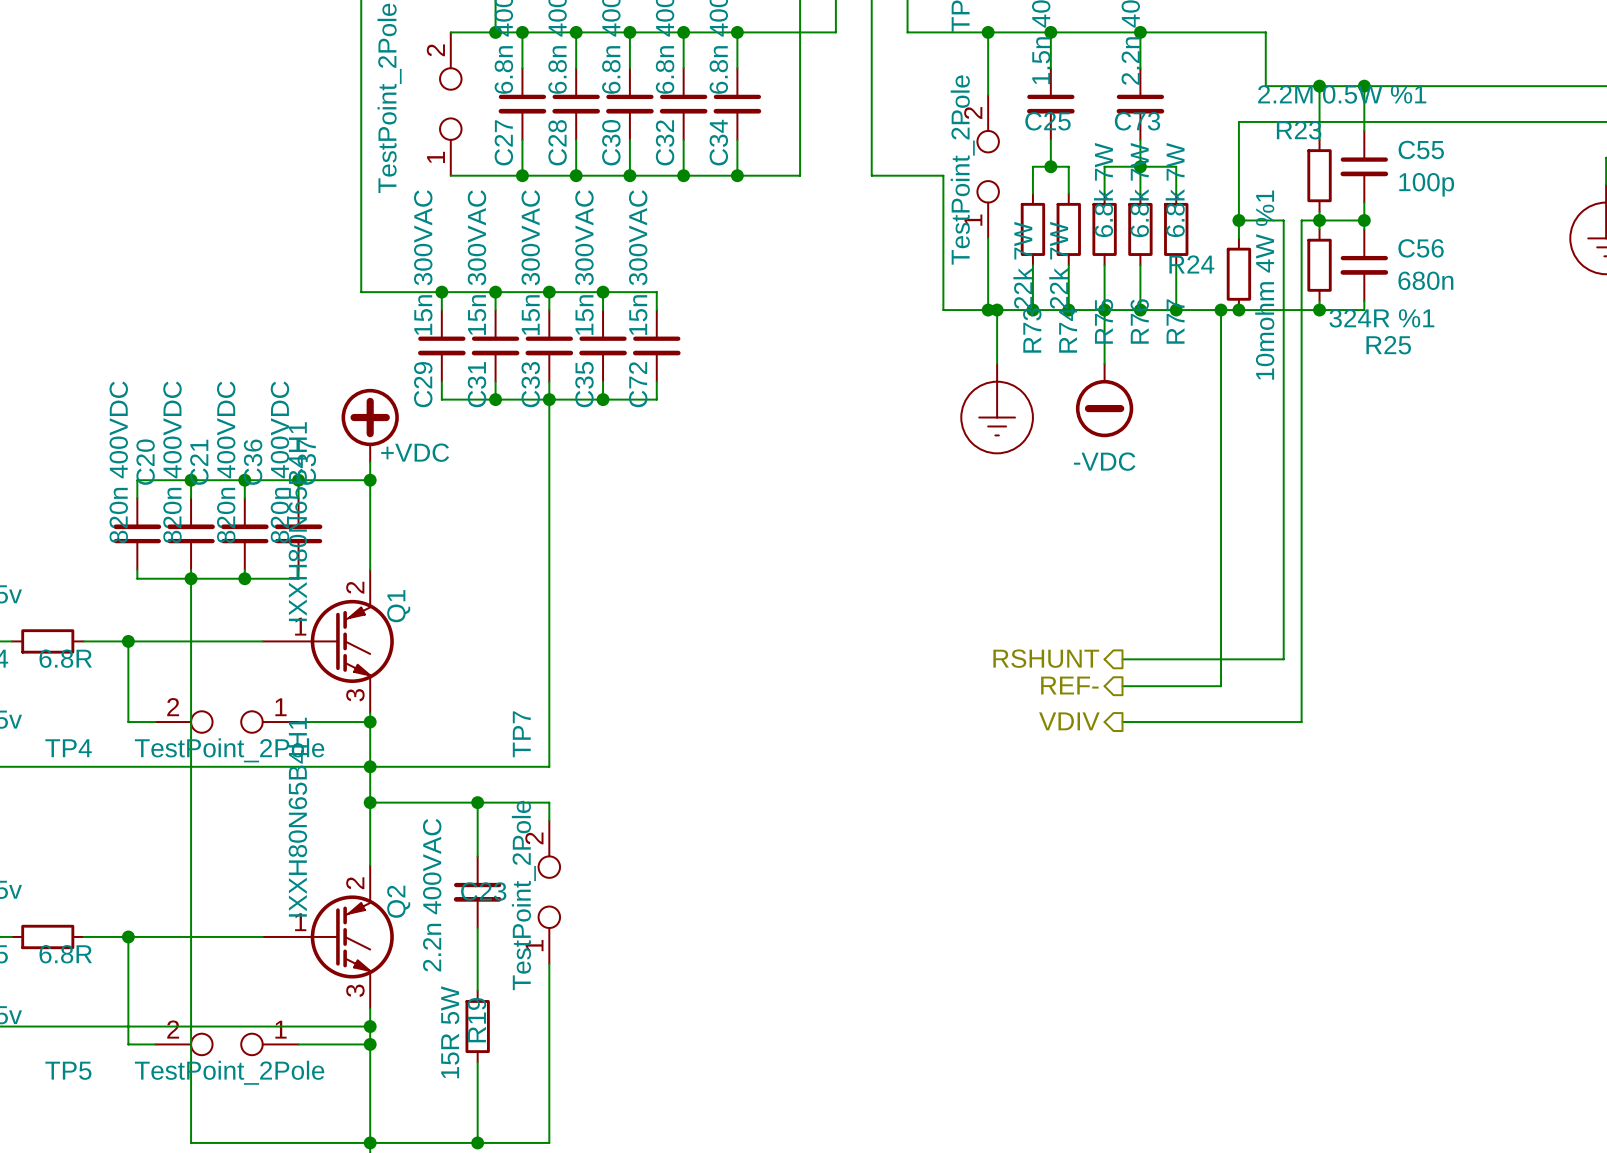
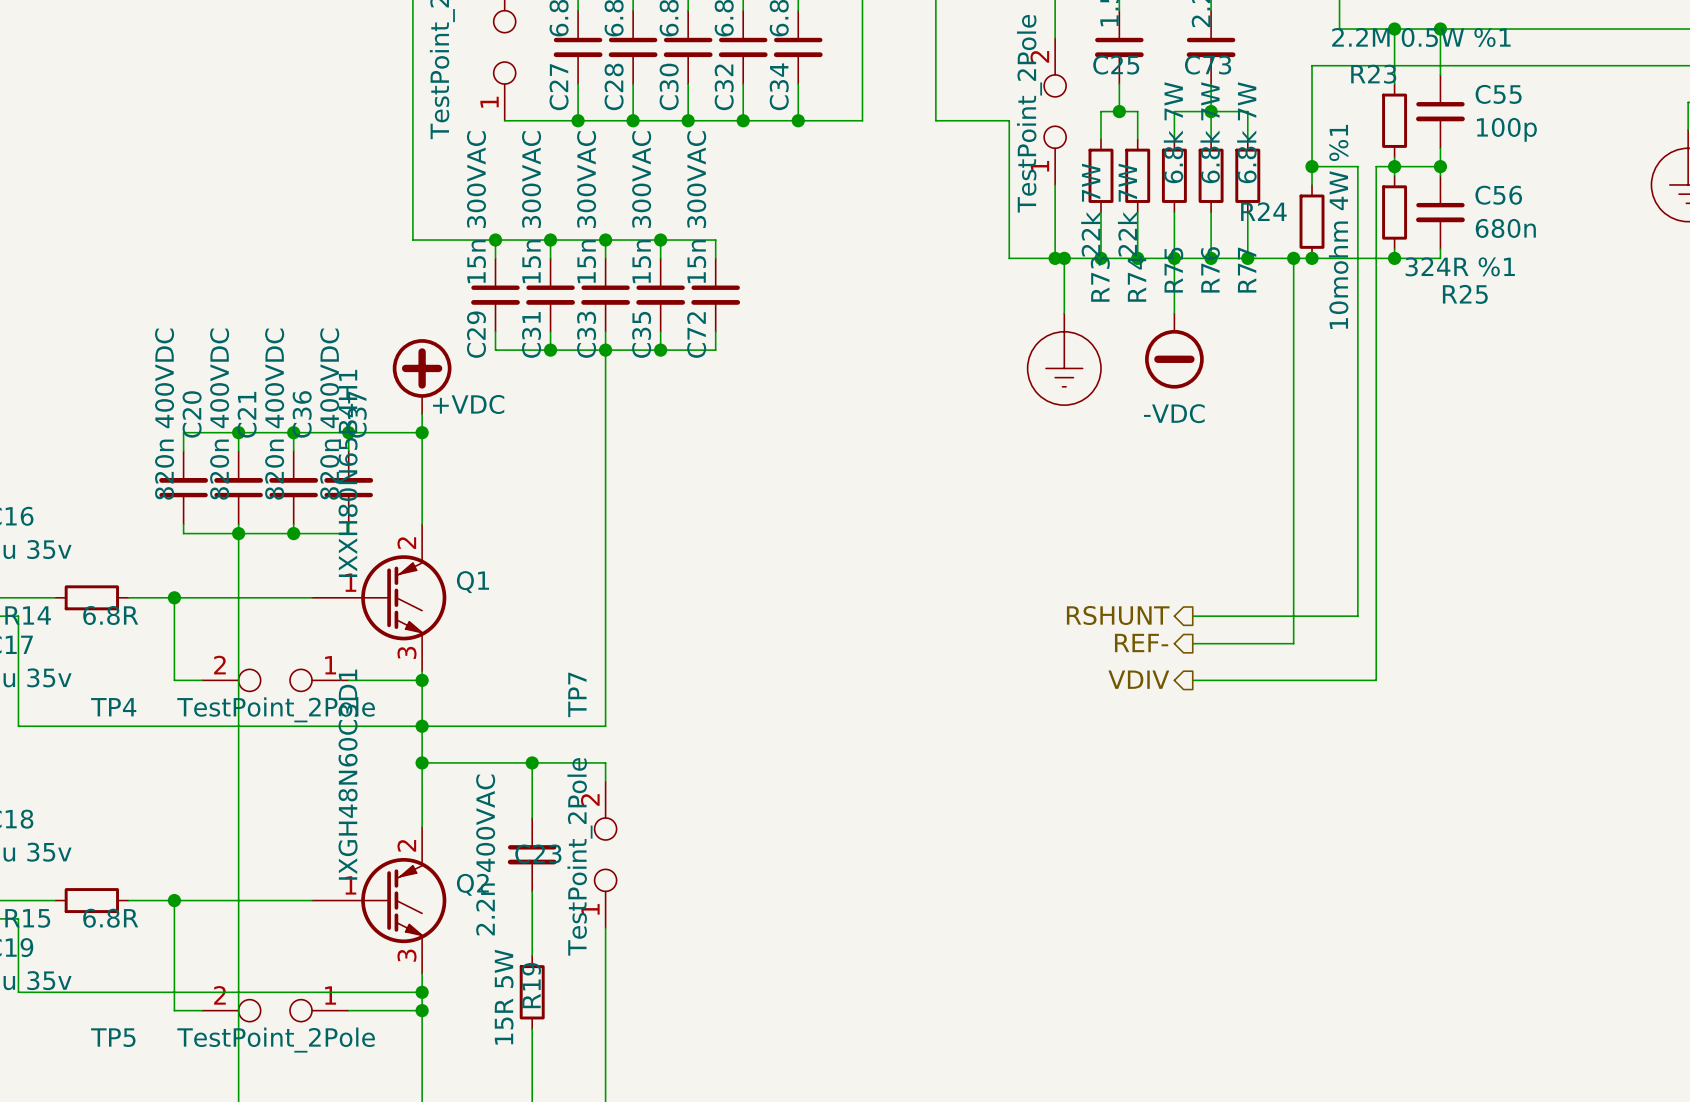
Q1 name rotation: 0° (398, 606) -> 90° clockwise (472, 582)
Q2 value: IXXH80N65B4H1 (297, 817) -> IXGH48N60C3D1 (348, 774)
Q2 name rotation: 0° (398, 901) -> 90° clockwise (472, 884)

